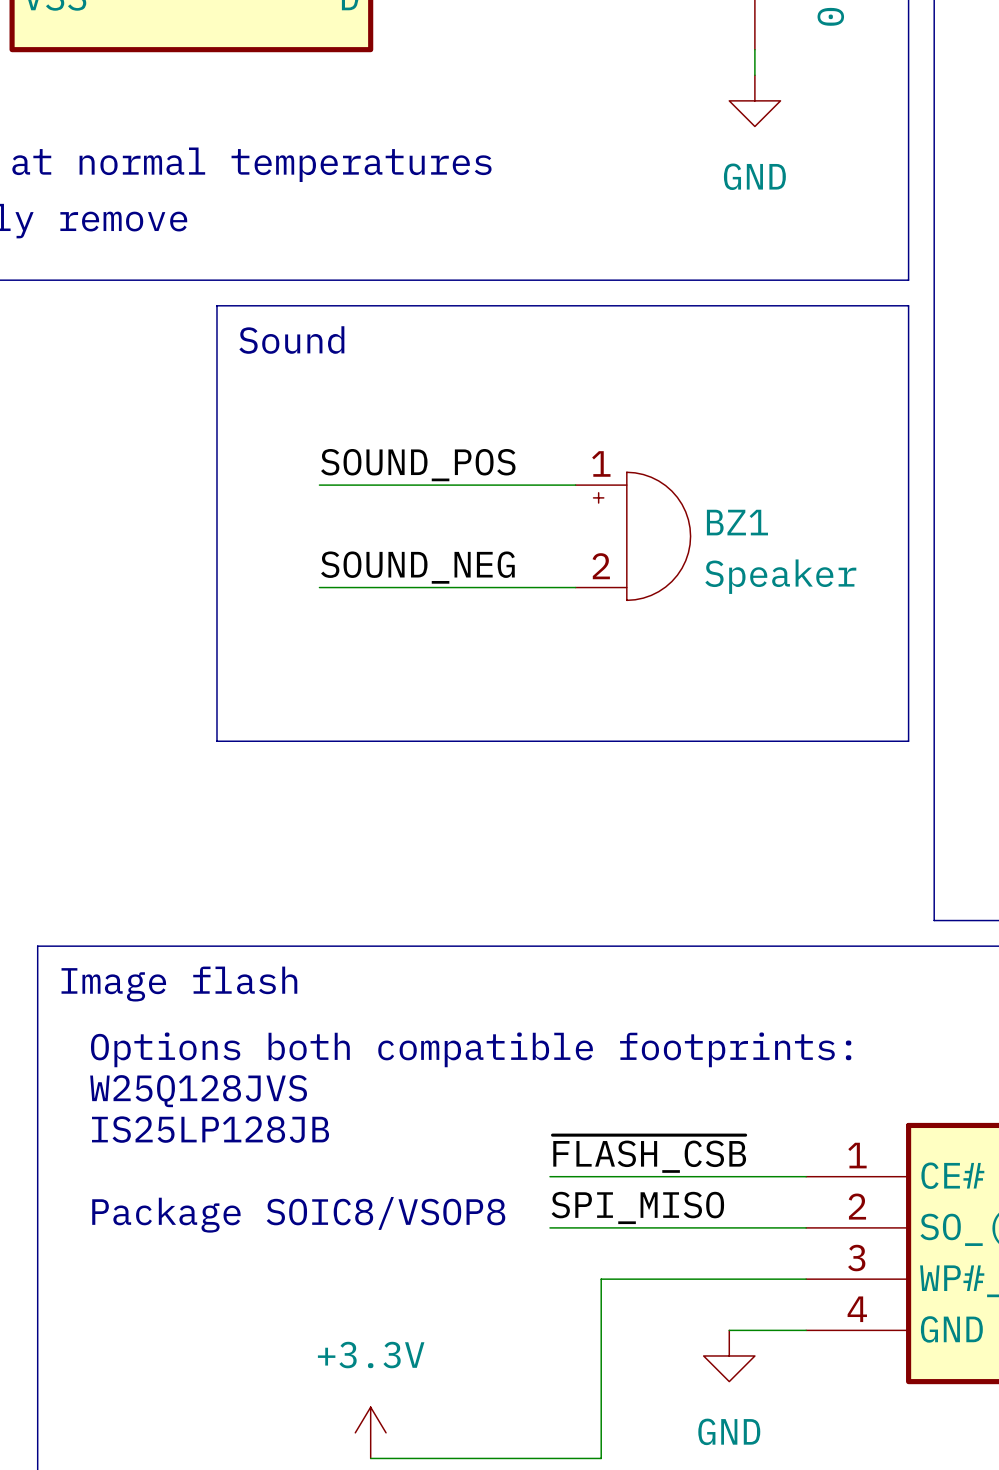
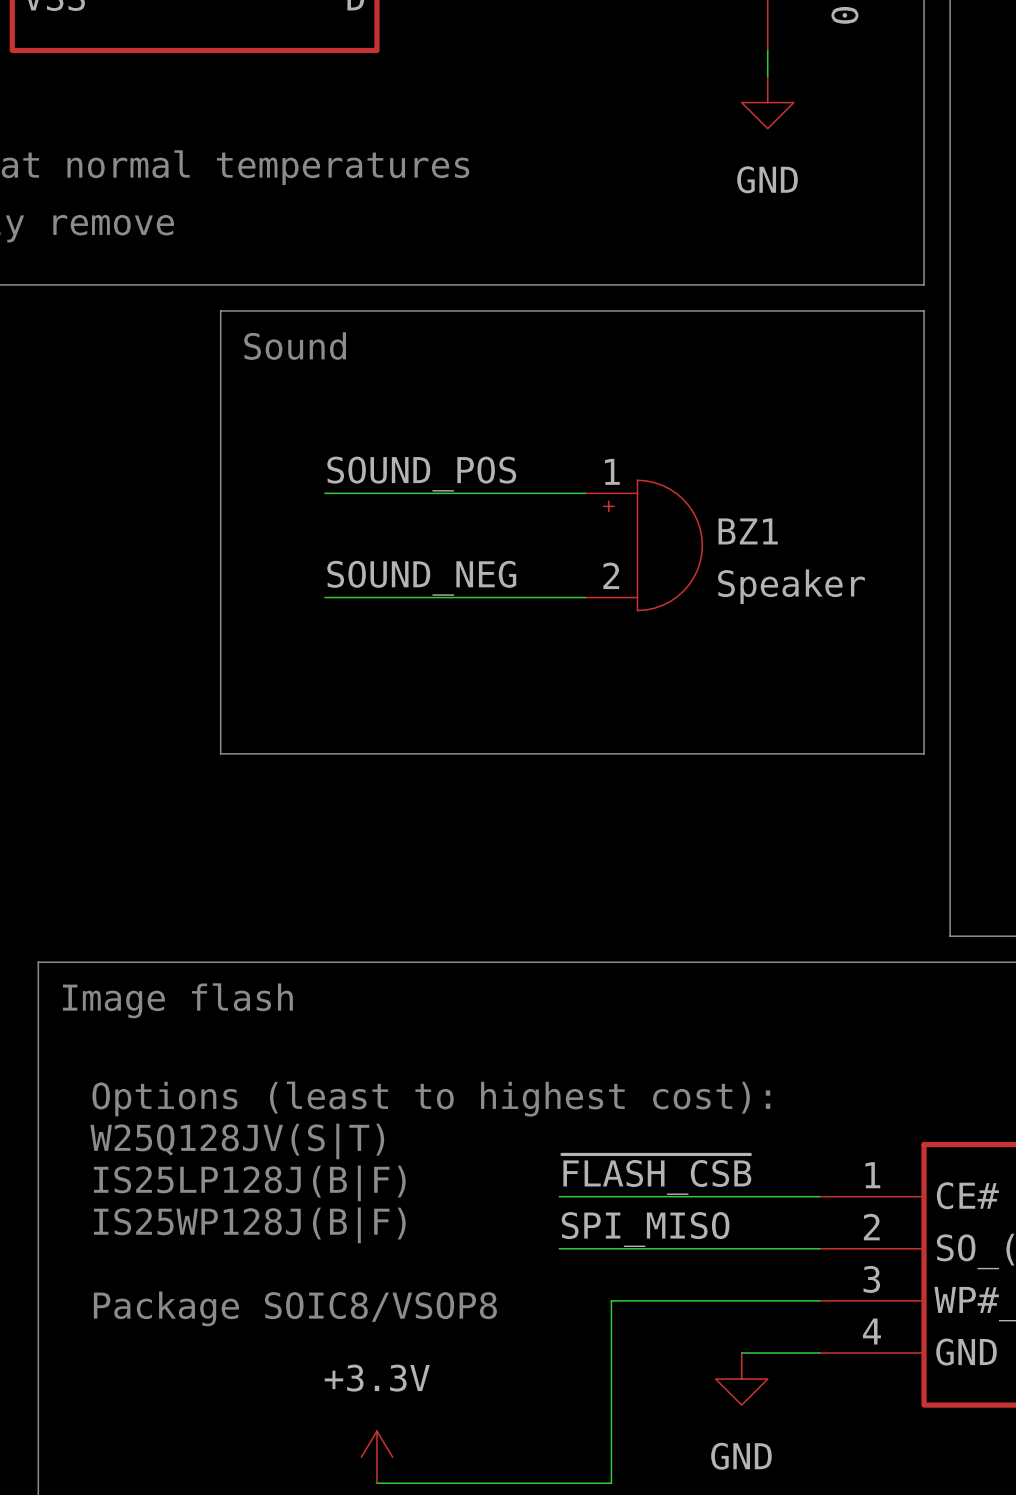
text: Options both compatible footprints: (471, 1049) -> none
text: W25Q128JVS (198, 1091) -> Options (least to highest cost): (431, 1099)
text: IS25LP128JB (210, 1129) -> W25Q128JV(S|T) (237, 1141)
text: none -> IS25LP128J(B|F) (249, 1183)
text: Package SOIC8/VSOP8 (298, 1214) -> IS25WP128J(B|F) (249, 1225)
text: none -> Package SOIC8/VSOP8 (295, 1308)

